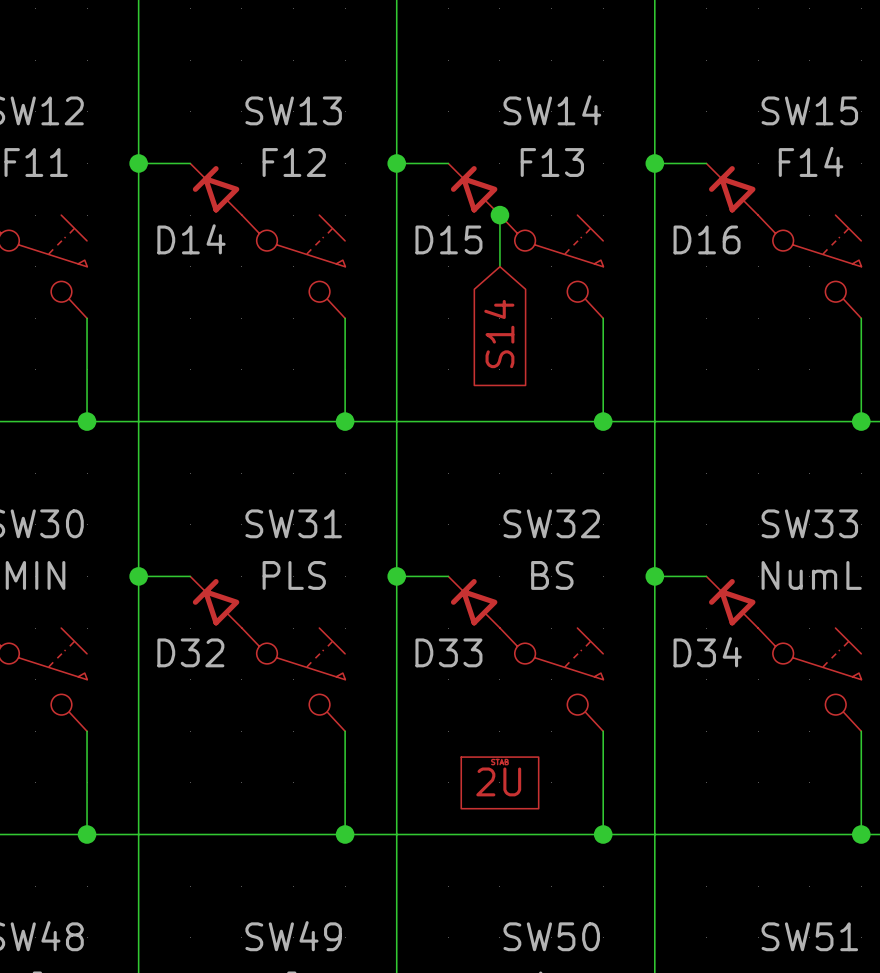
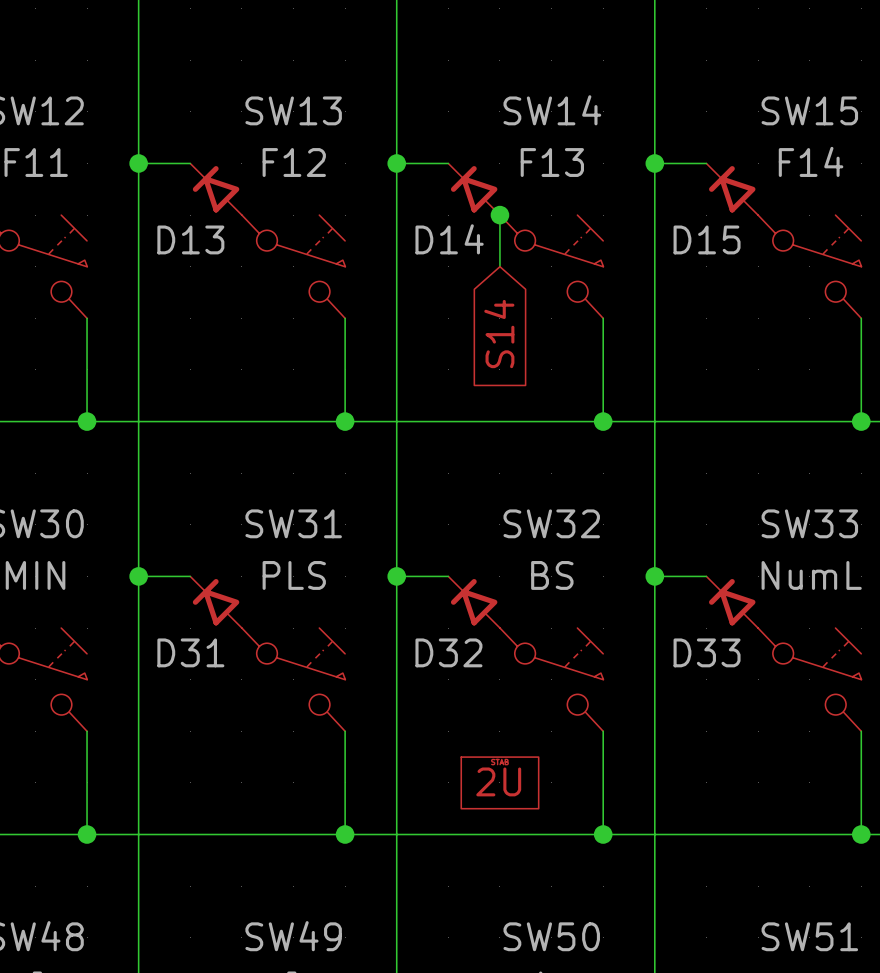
D14 name: D14 (191, 239) -> D13 (190, 239)
D15 name: D15 (448, 239) -> D14 (449, 239)
D16 name: D16 (707, 239) -> D15 (707, 239)
D32 name: D32 (190, 652) -> D31 (190, 652)
D33 name: D33 (448, 652) -> D32 (448, 652)
D34 name: D34 (707, 652) -> D33 (707, 652)

